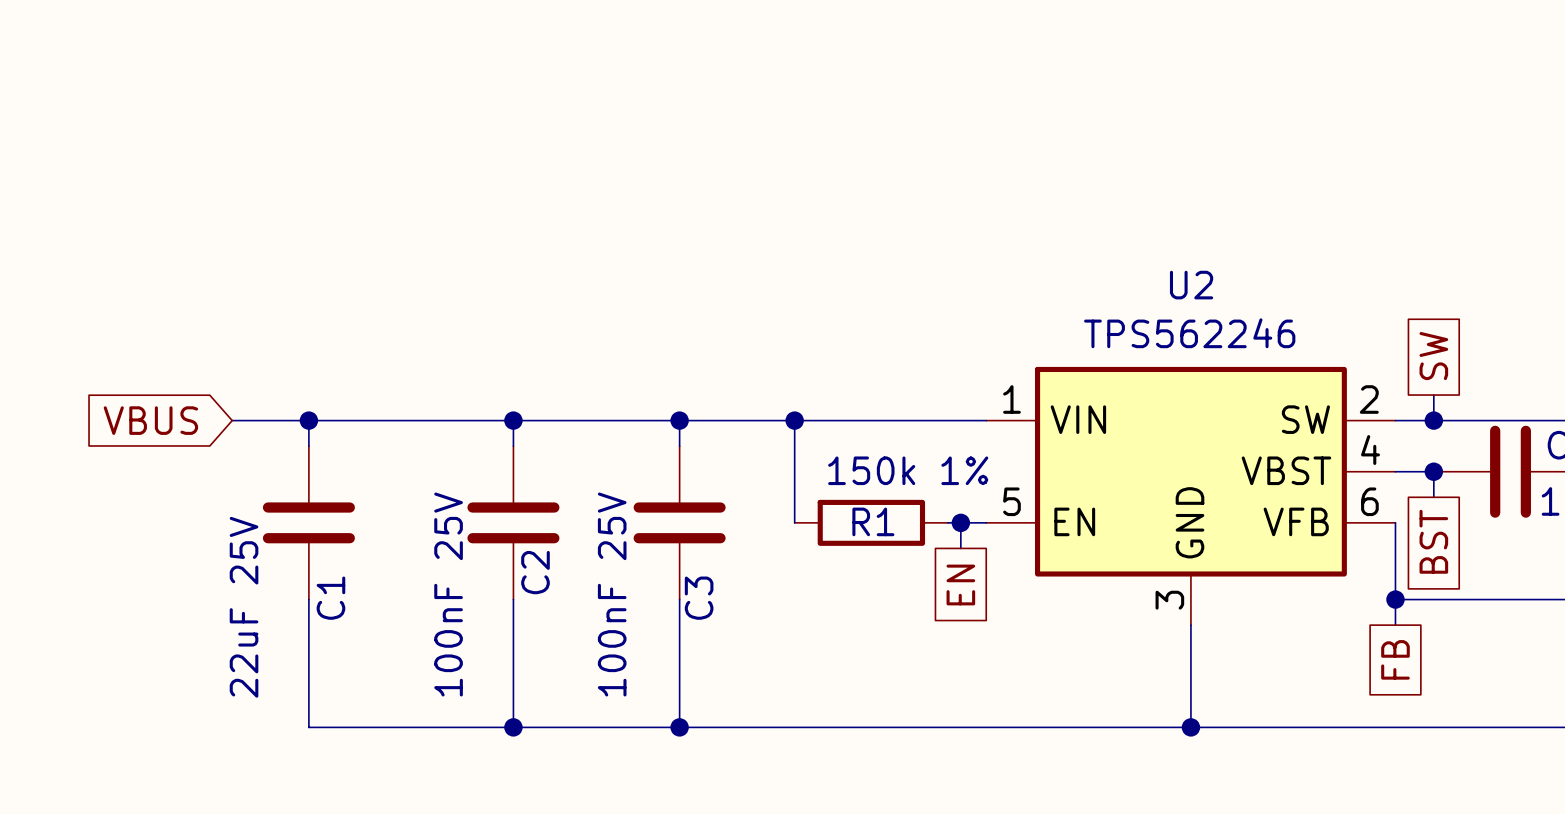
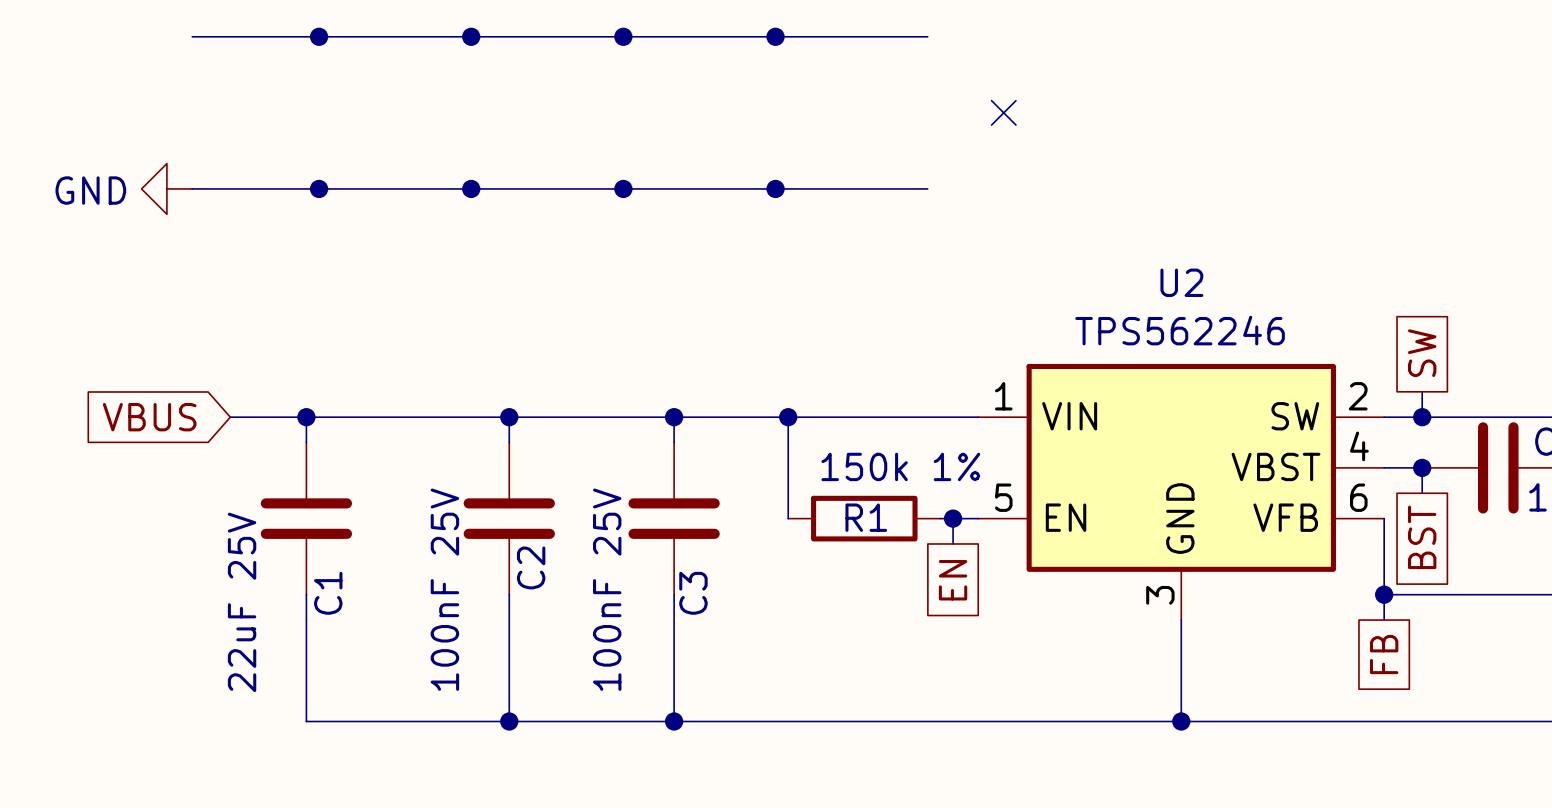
wire: none -> (192, 36) (927, 36)
junction: none -> (319, 36)
junction: none -> (471, 36)
junction: none -> (623, 36)
junction: none -> (775, 36)
no-connect mark: none -> (1003, 112)
power symbol: none -> GND (166, 188)
wire: none -> (192, 188) (927, 188)
junction: none -> (319, 188)
junction: none -> (471, 188)
junction: none -> (623, 188)
junction: none -> (775, 188)

